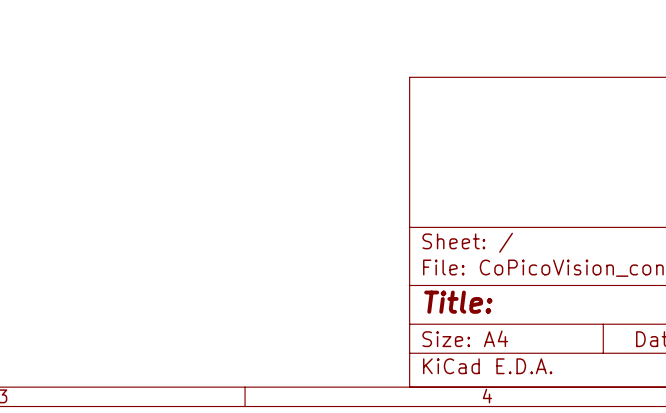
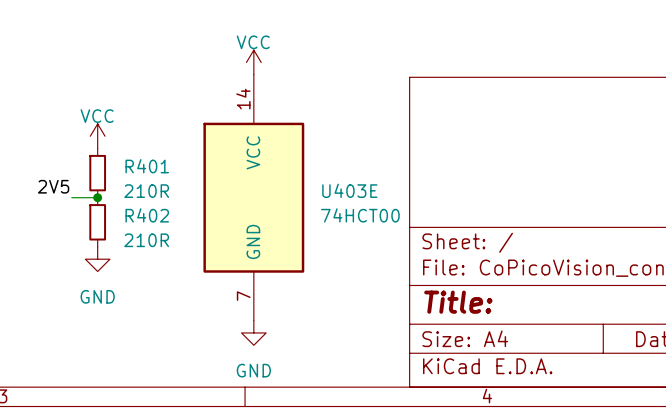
power symbol: none -> VCC (253, 62)
power symbol: none -> VCC (97, 136)
R401: none -> 210R (97, 173)
label: none -> 2V5 (53, 186)
wire: none -> (71, 197) (97, 197)
junction: none -> (97, 197)
U403E: none -> 74HCT00 (253, 197)
R402: none -> 210R (97, 222)
power symbol: none -> GND (97, 259)
power symbol: none -> GND (253, 332)

